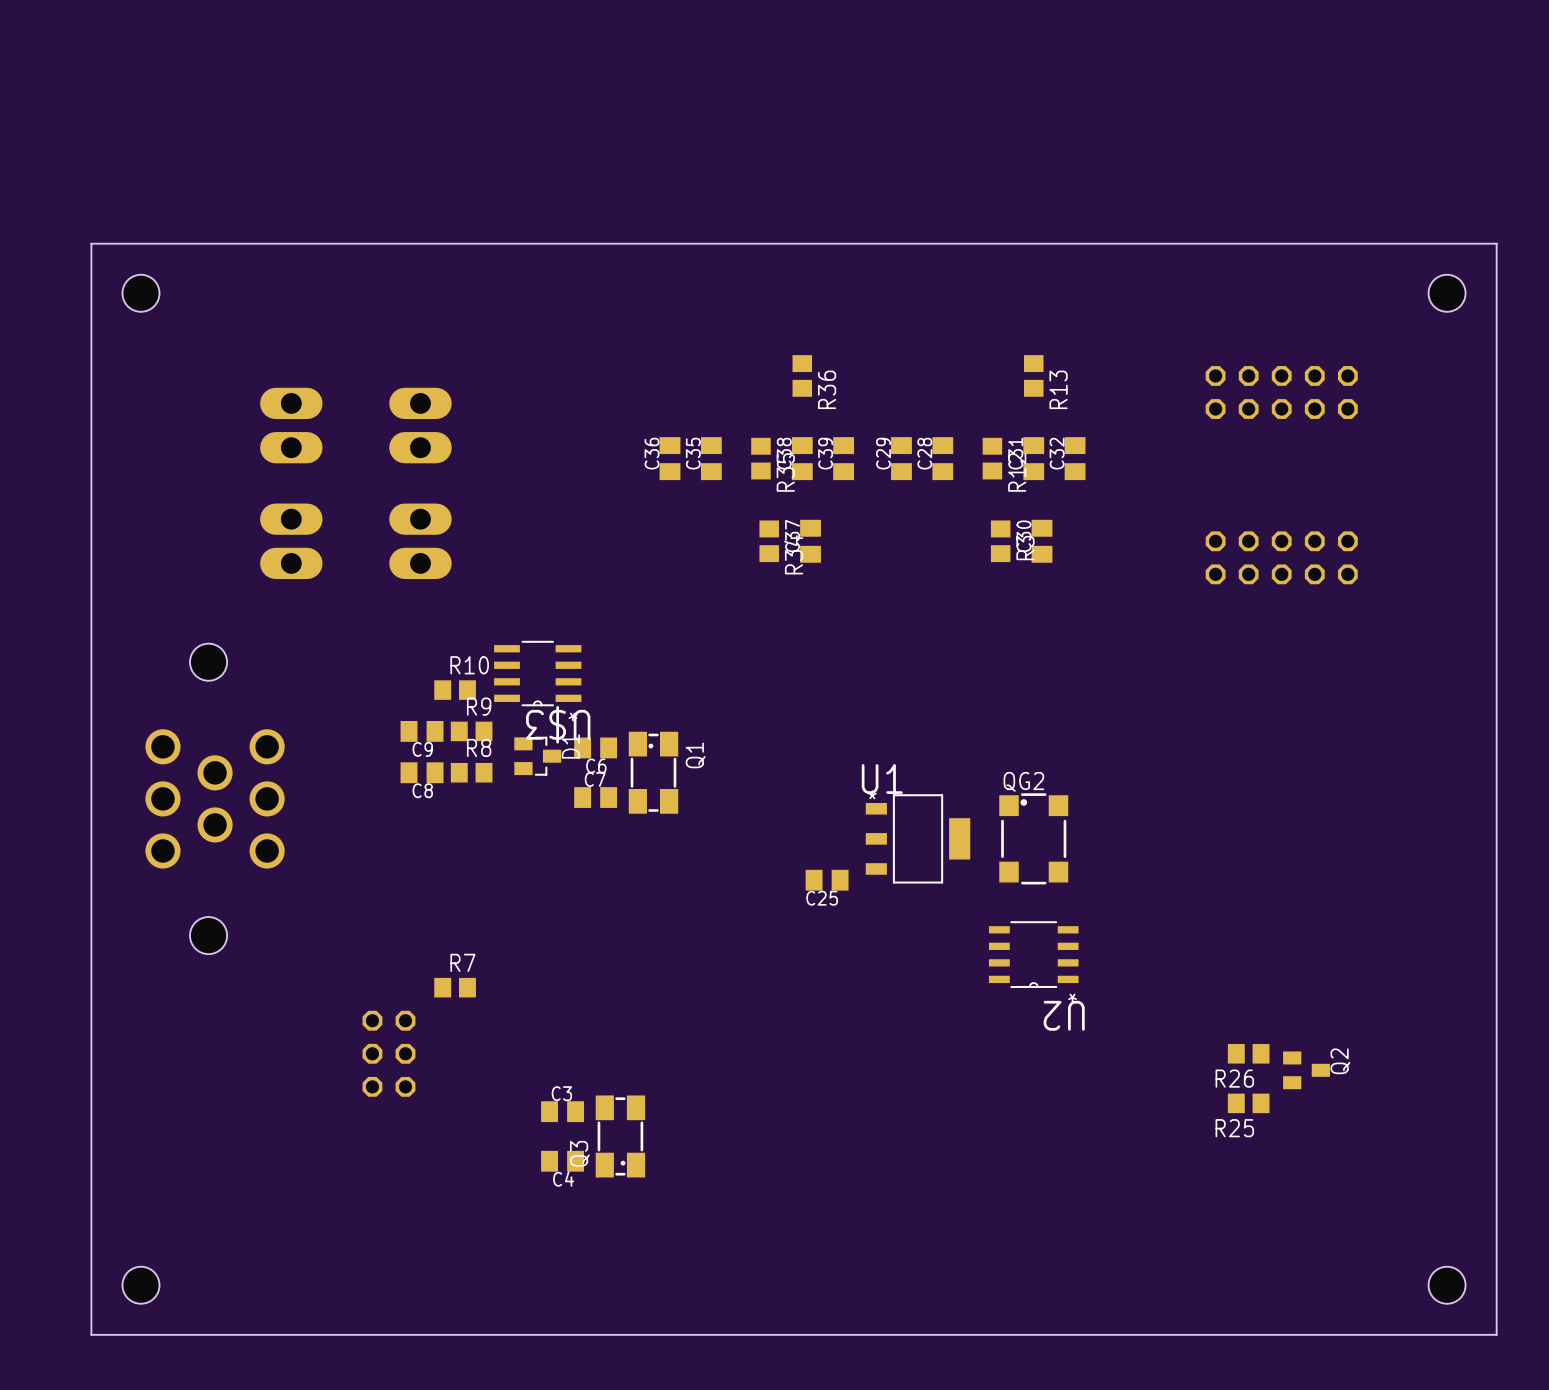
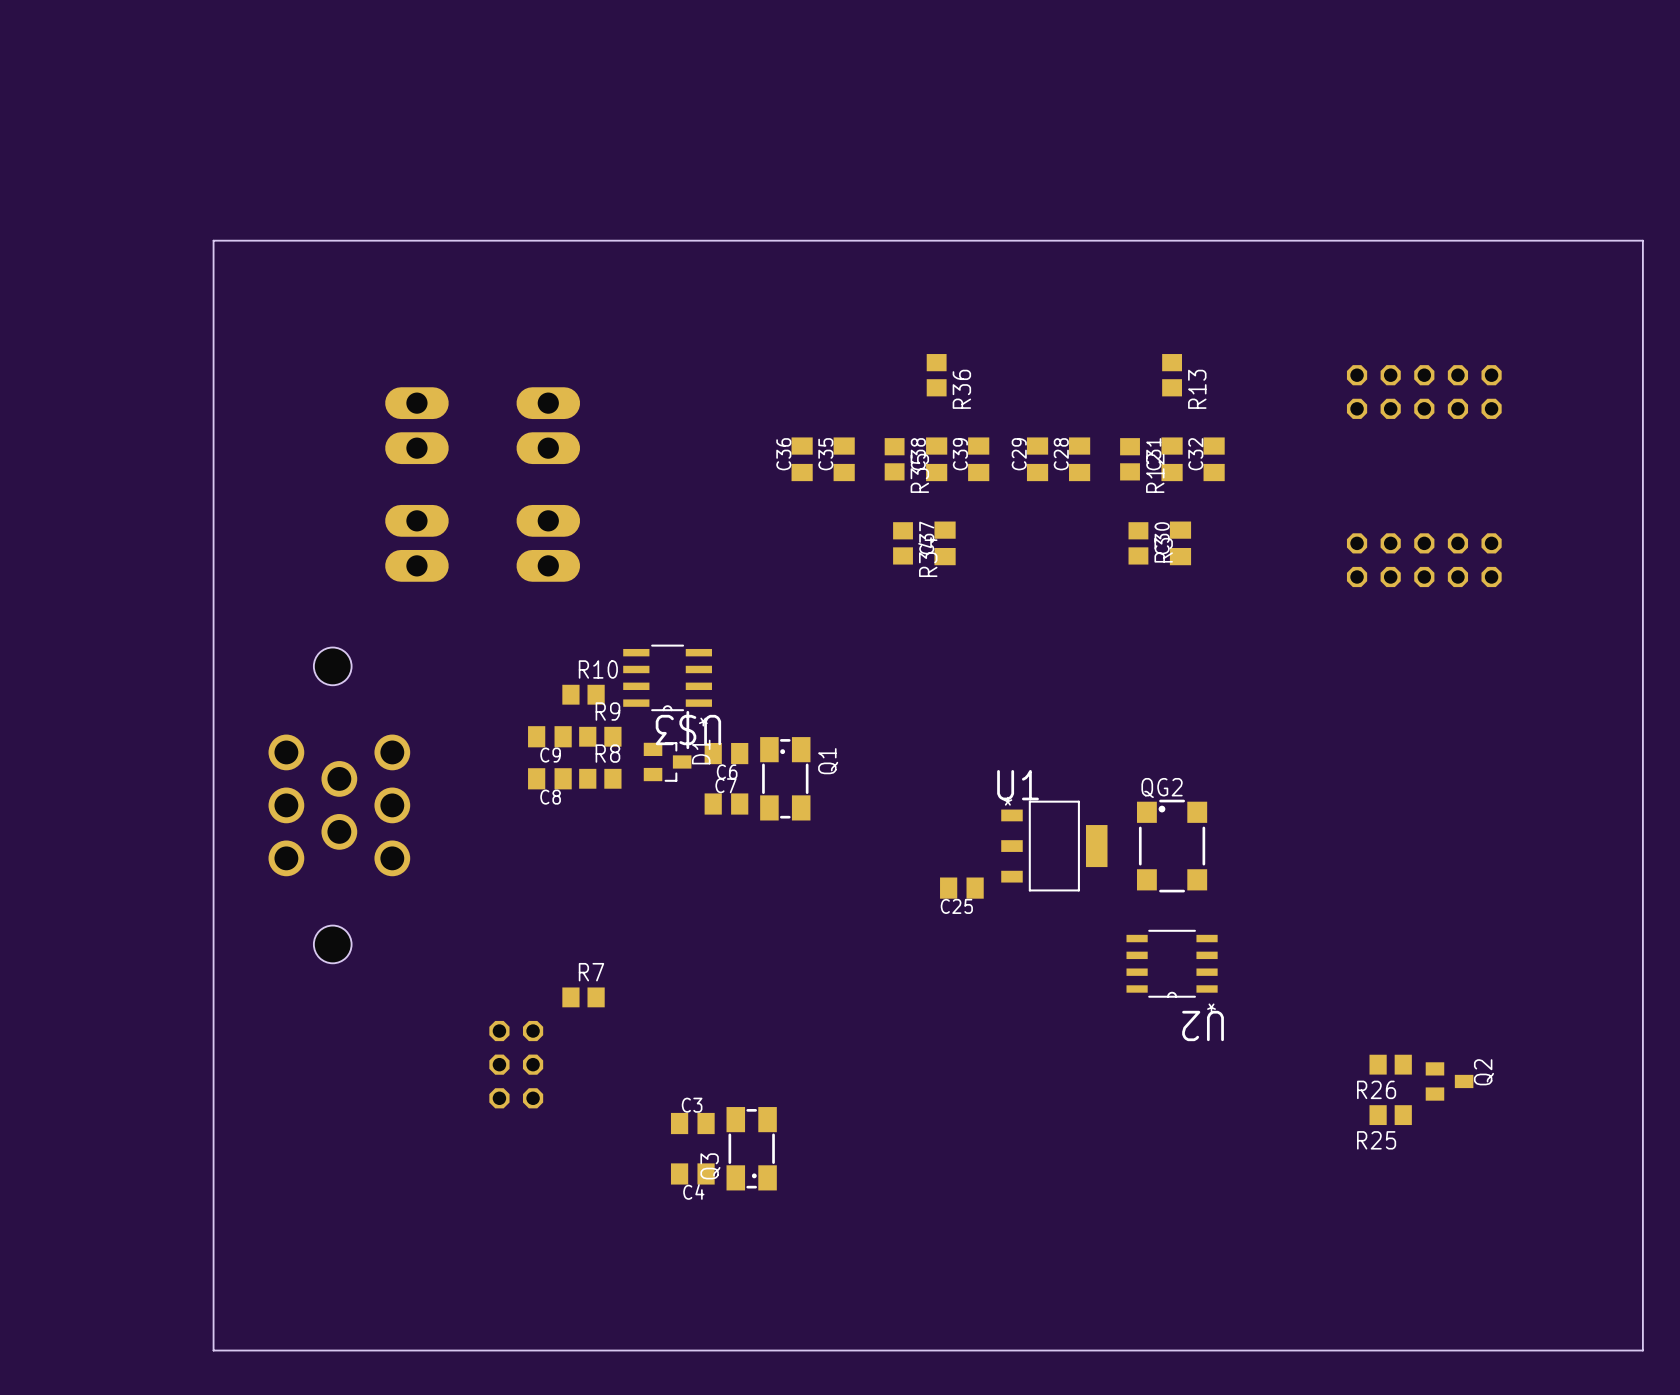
hole: (140, 293) -> none
hole: (1447, 293) -> none
hole: (140, 1285) -> none
hole: (1447, 1285) -> none

